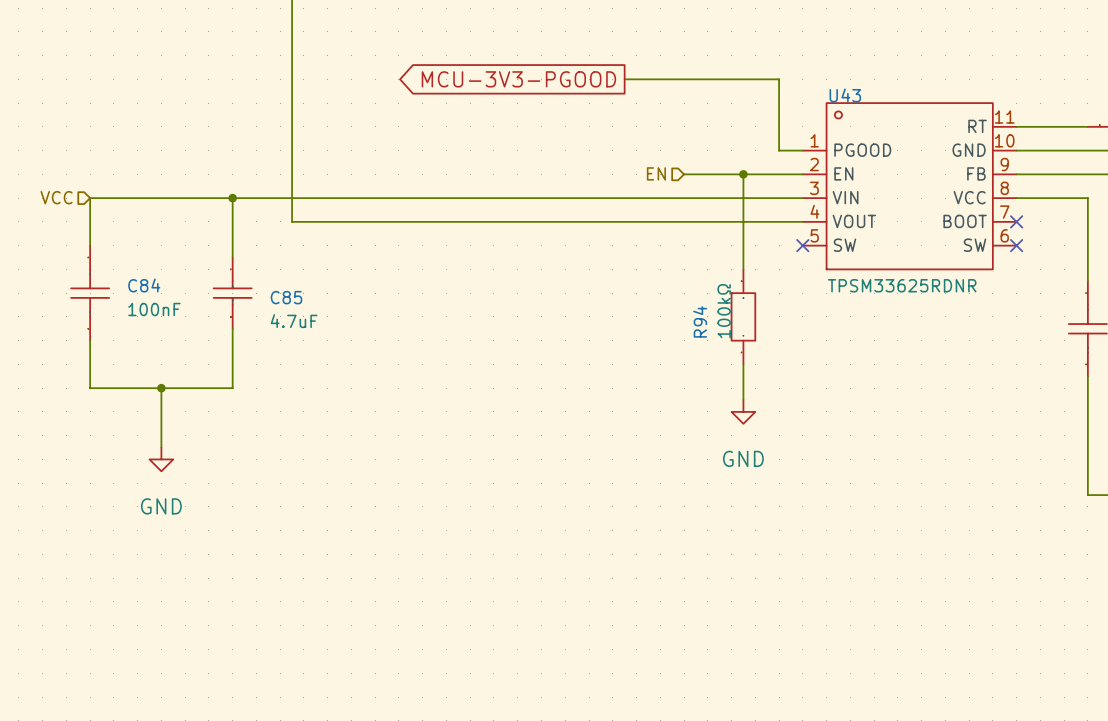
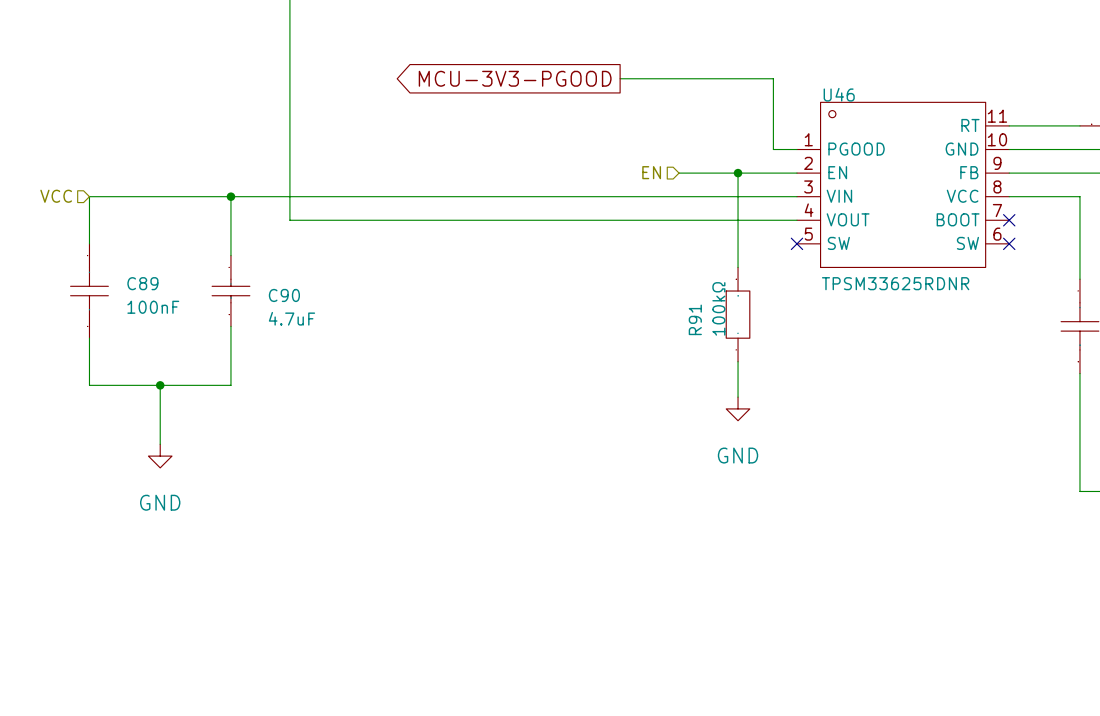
U43 name: U43 (845, 95) -> U46 (839, 94)
C84 name: C84 (144, 285) -> C89 (142, 283)
C85 name: C85 (286, 297) -> C90 (284, 295)
R94 name: R94 (700, 321) -> R91 (695, 319)

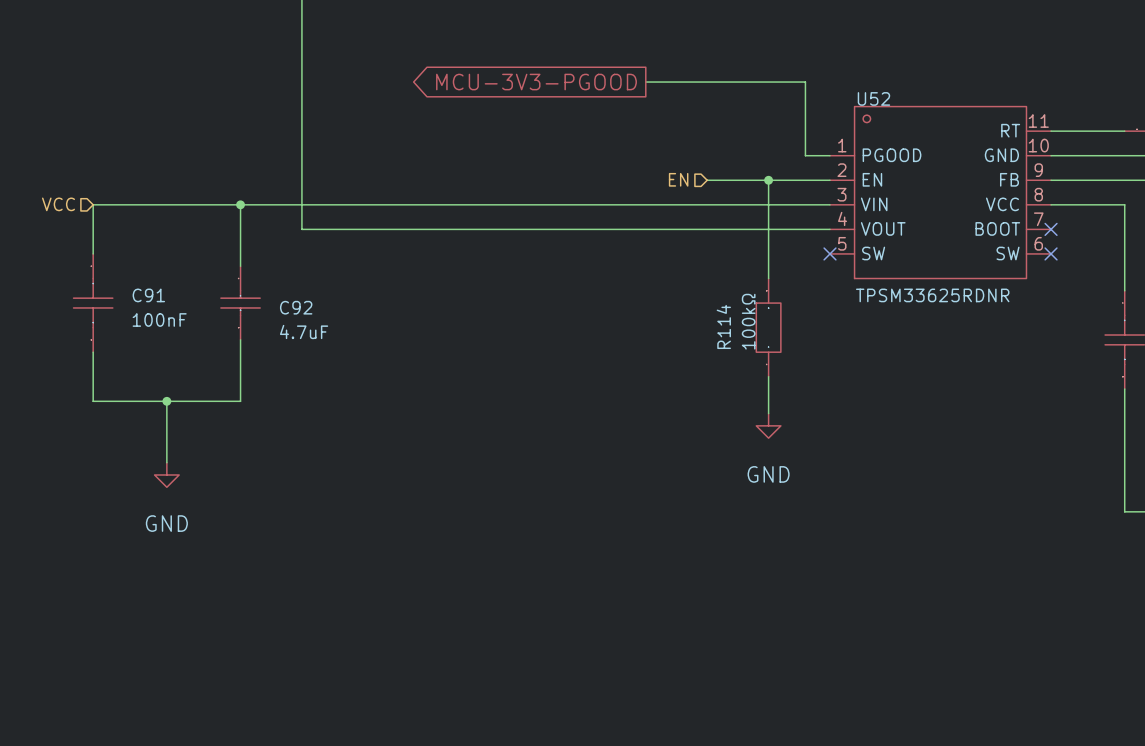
U46 name: U46 (839, 94) -> U52 (873, 98)
C89 name: C89 (142, 283) -> C91 (148, 295)
C90 name: C90 (284, 295) -> C92 (296, 307)
R91 name: R91 (695, 319) -> R114 (723, 326)

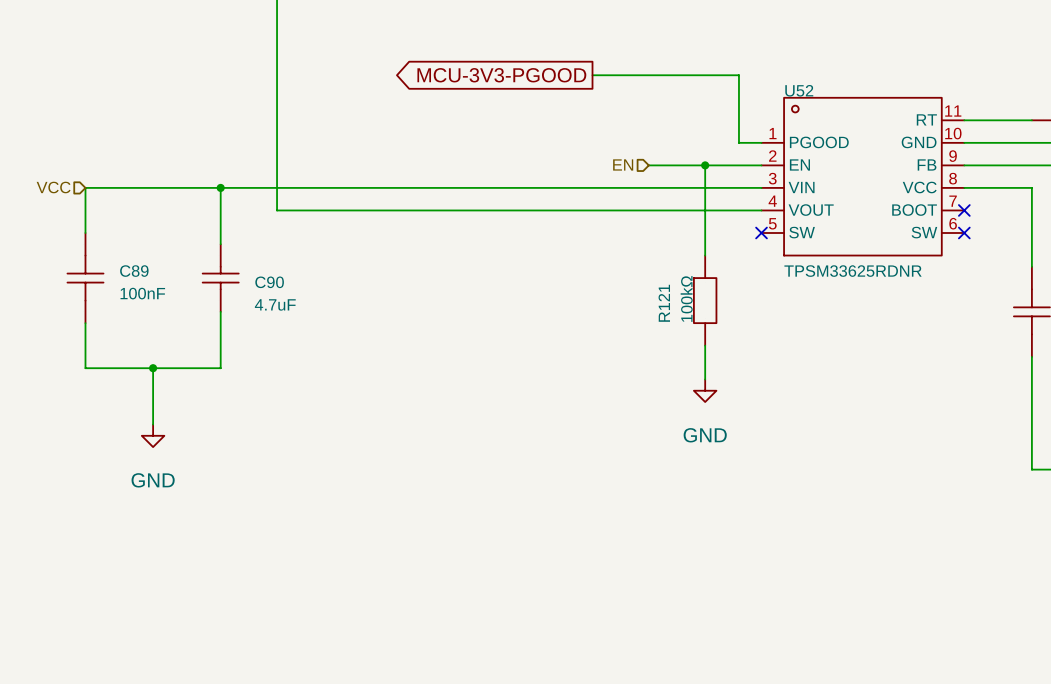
C91 name: C91 (148, 295) -> C89 (134, 271)
C92 name: C92 (296, 307) -> C90 (269, 282)
R114 name: R114 (723, 326) -> R121 (664, 303)

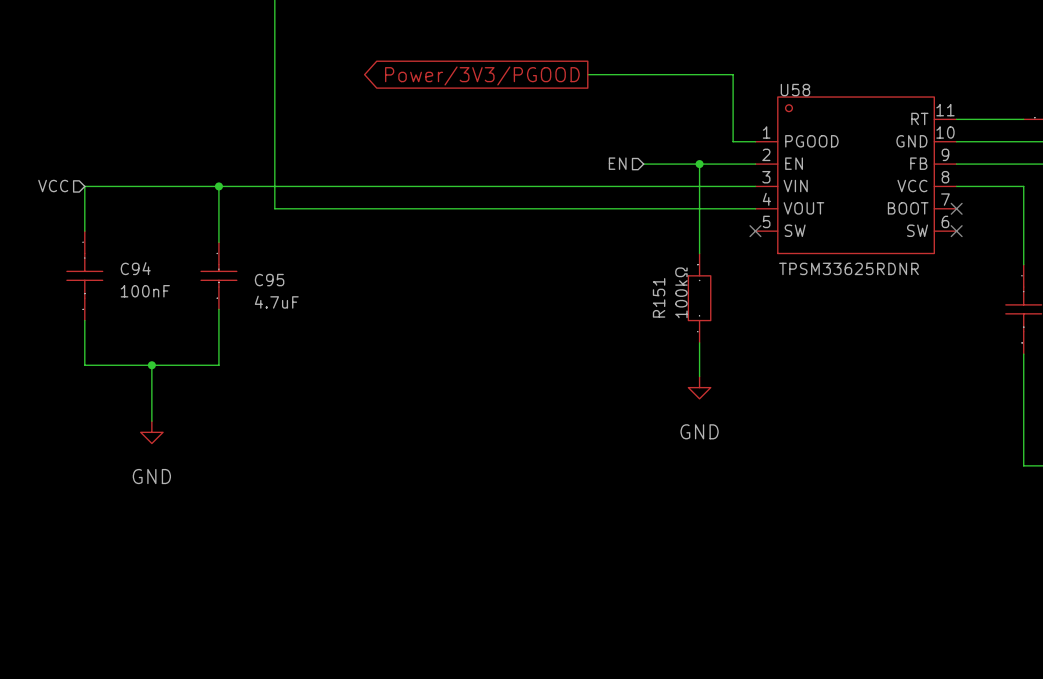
global label: MCU-3V3-PGOOD (501, 75) -> Power/3V3/PGOOD (482, 75)
U52 name: U52 (799, 90) -> U58 (795, 90)
C89 name: C89 (134, 271) -> C94 (135, 268)
C90 name: C90 (269, 282) -> C95 (269, 280)
R121 name: R121 (664, 303) -> R151 (659, 297)

